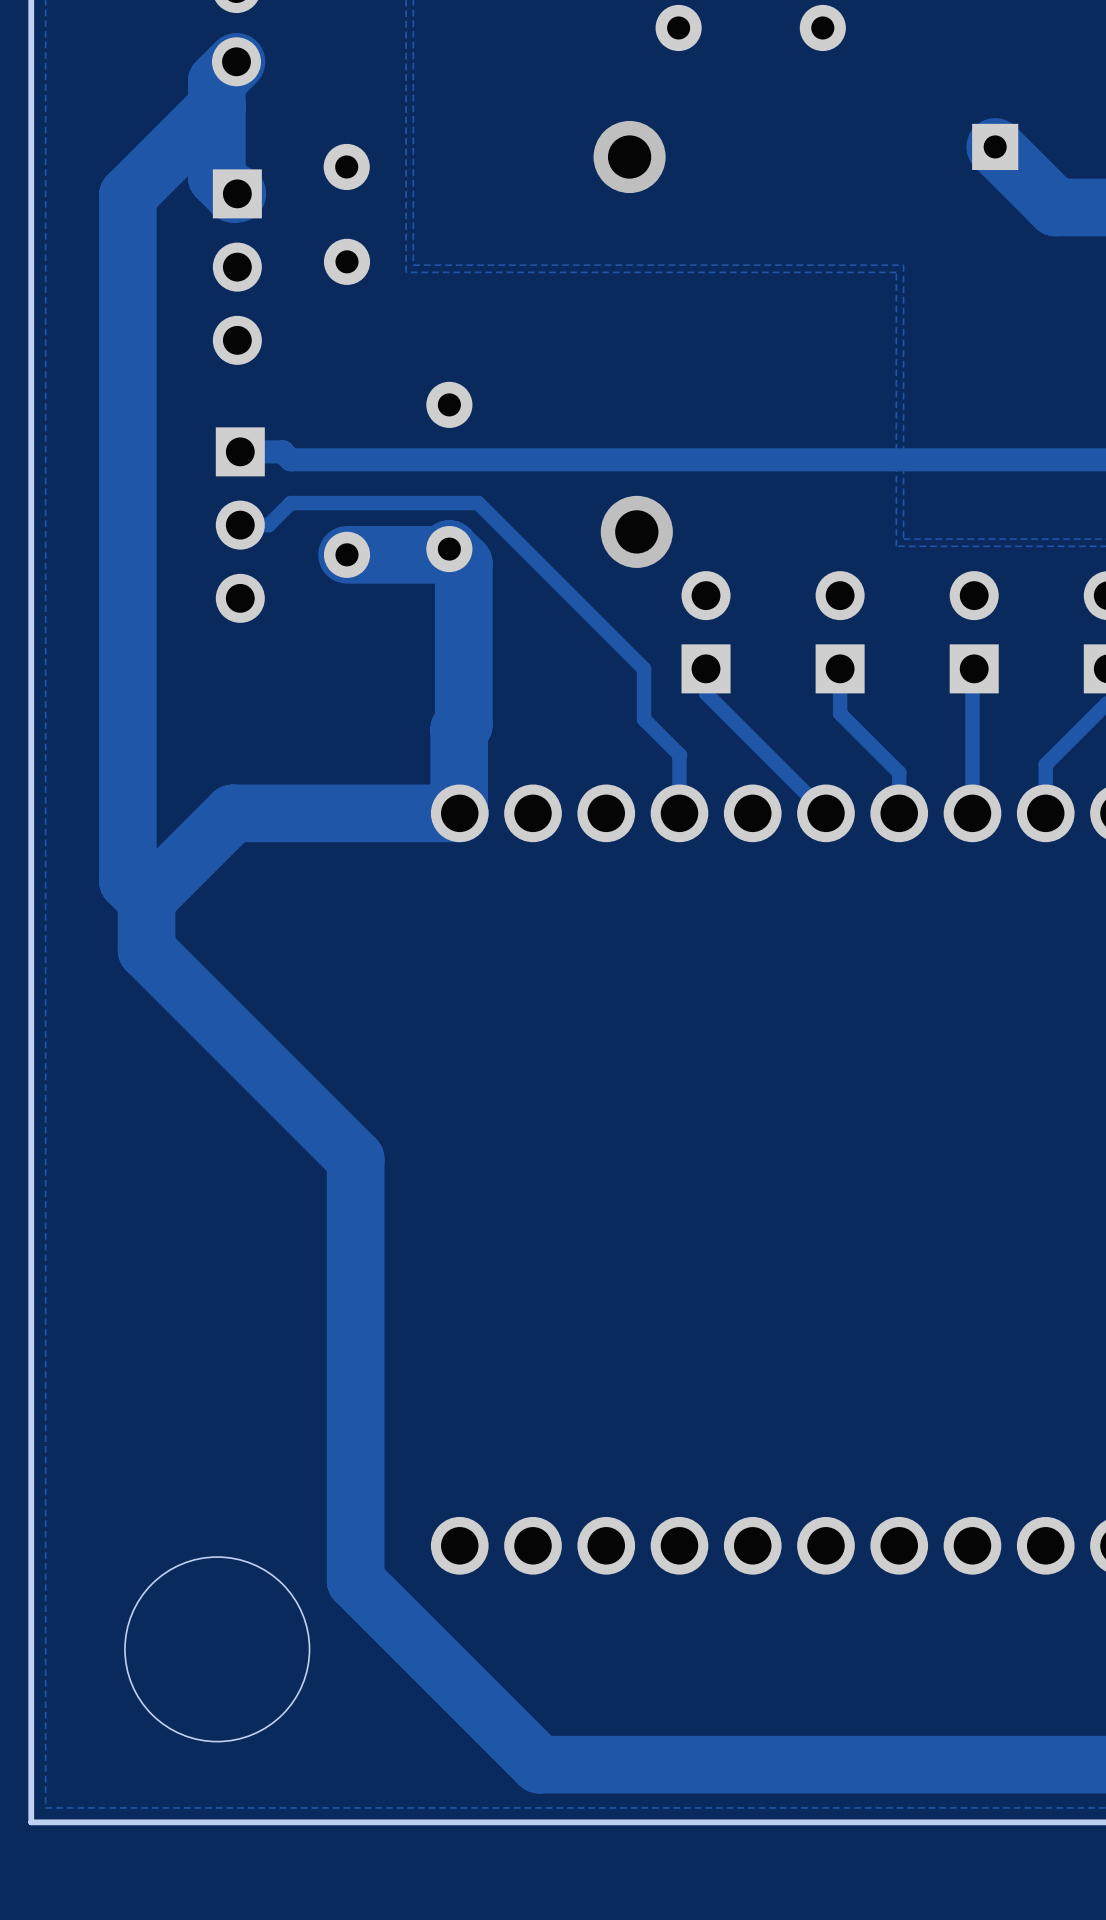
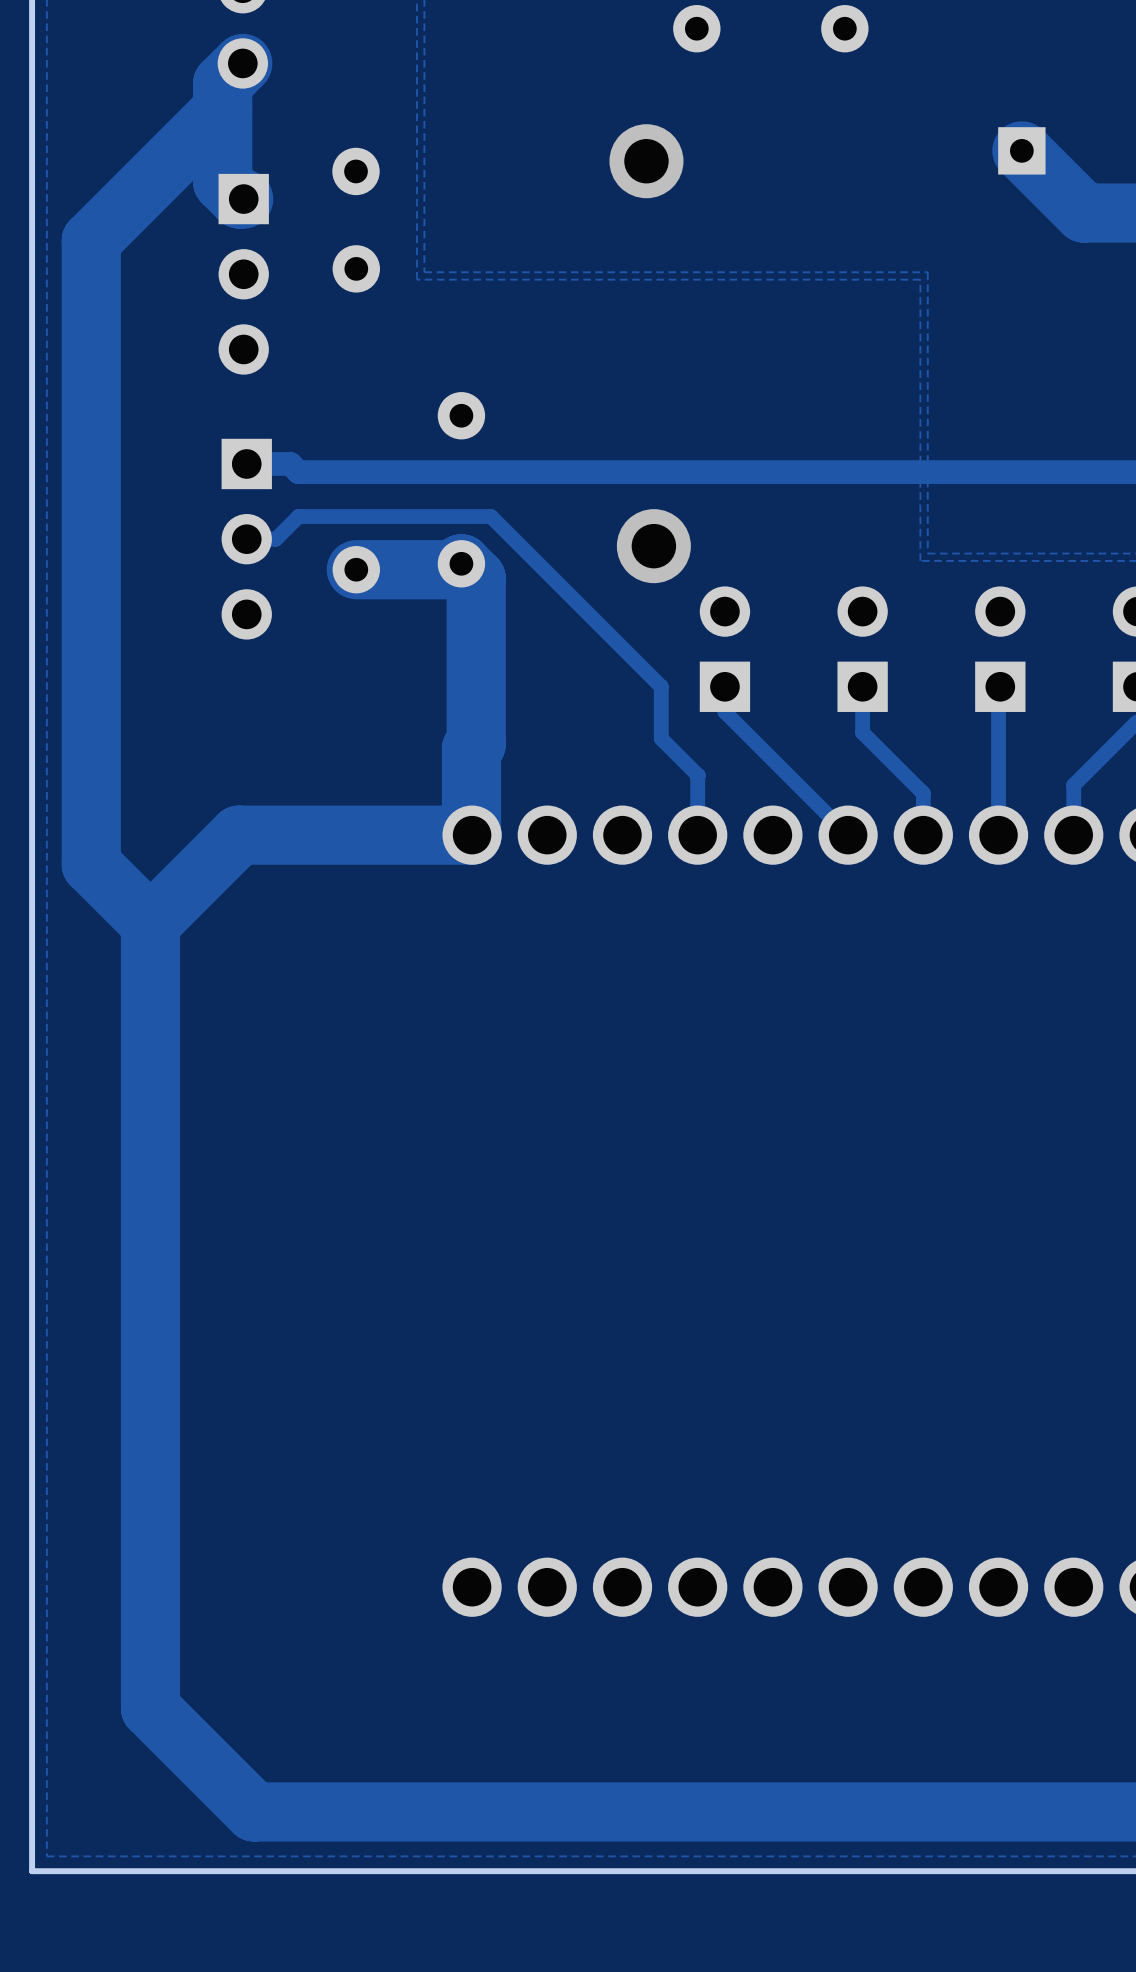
track: (127, 195) (127, 880) -> (131, 200) (91, 240) (91, 864) (131, 904)
track: (146, 950) (355, 1159) (355, 1580) (539, 1764) -> (150, 975) (150, 1708) (254, 1811) (553, 1811)
round board edge: [124, 1556, 311, 1743] -> none

